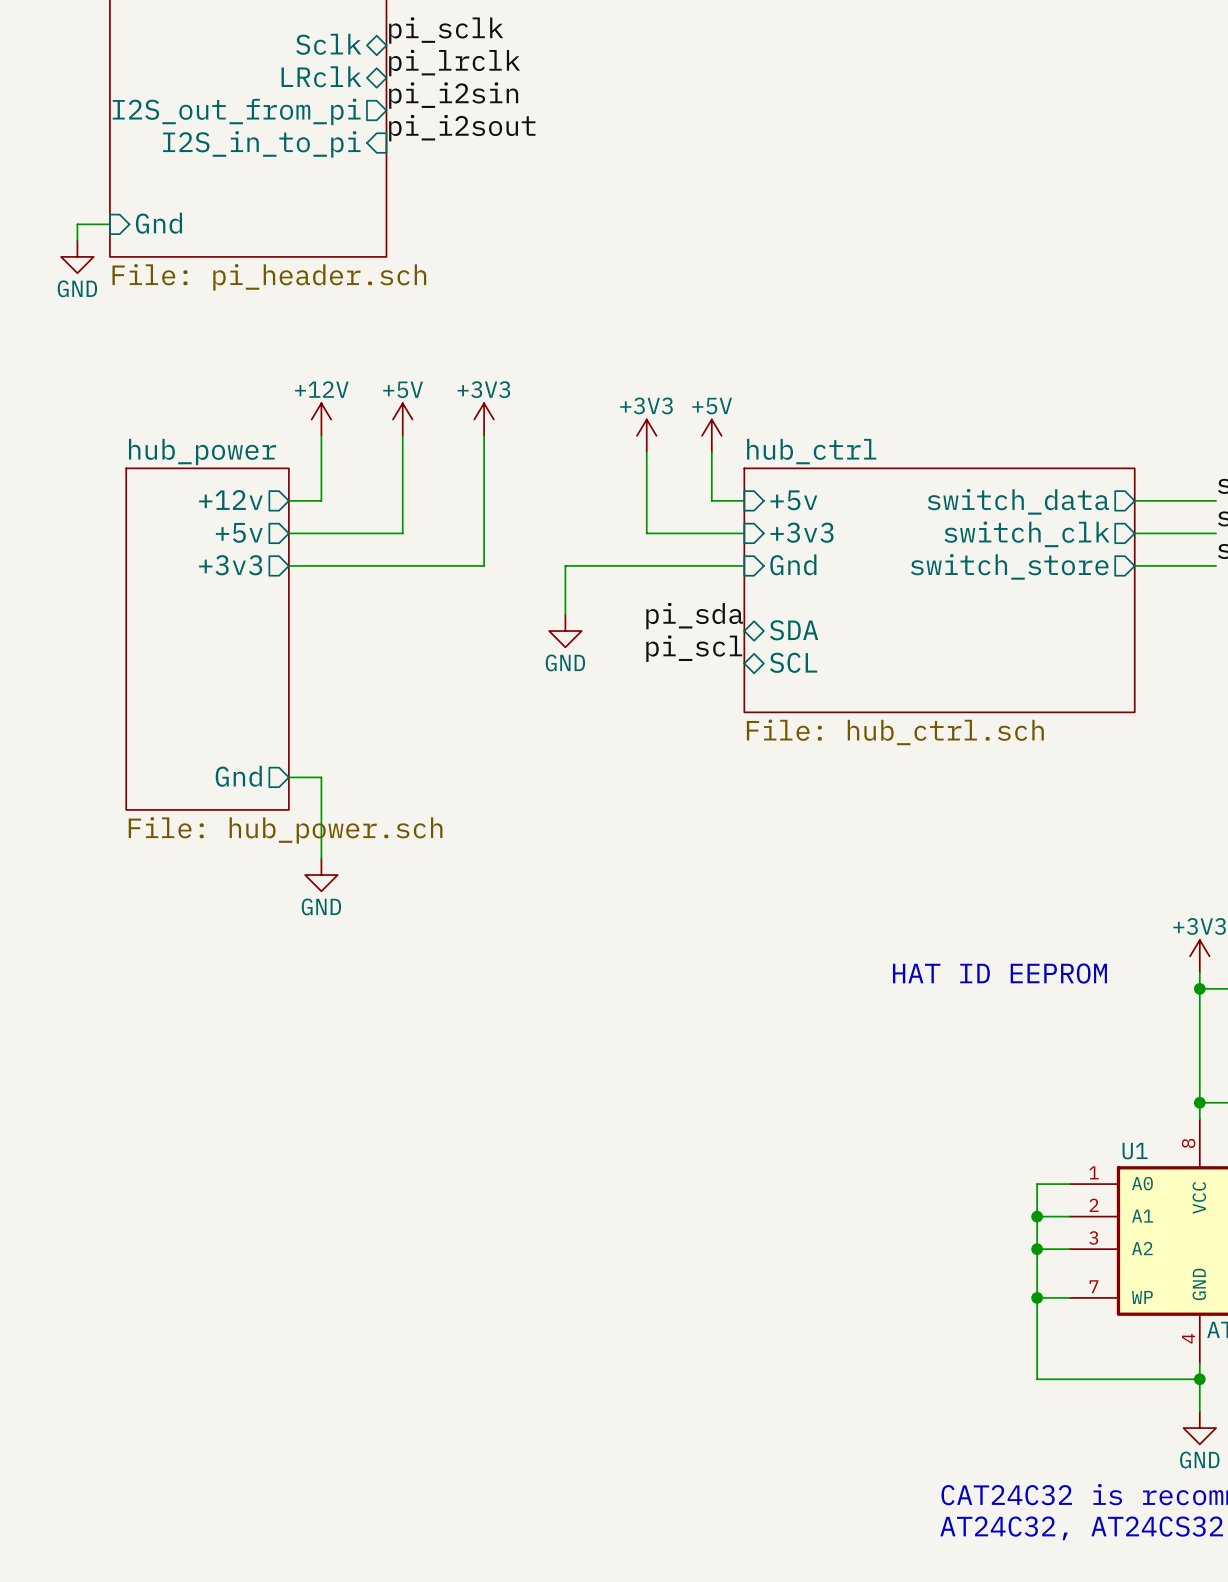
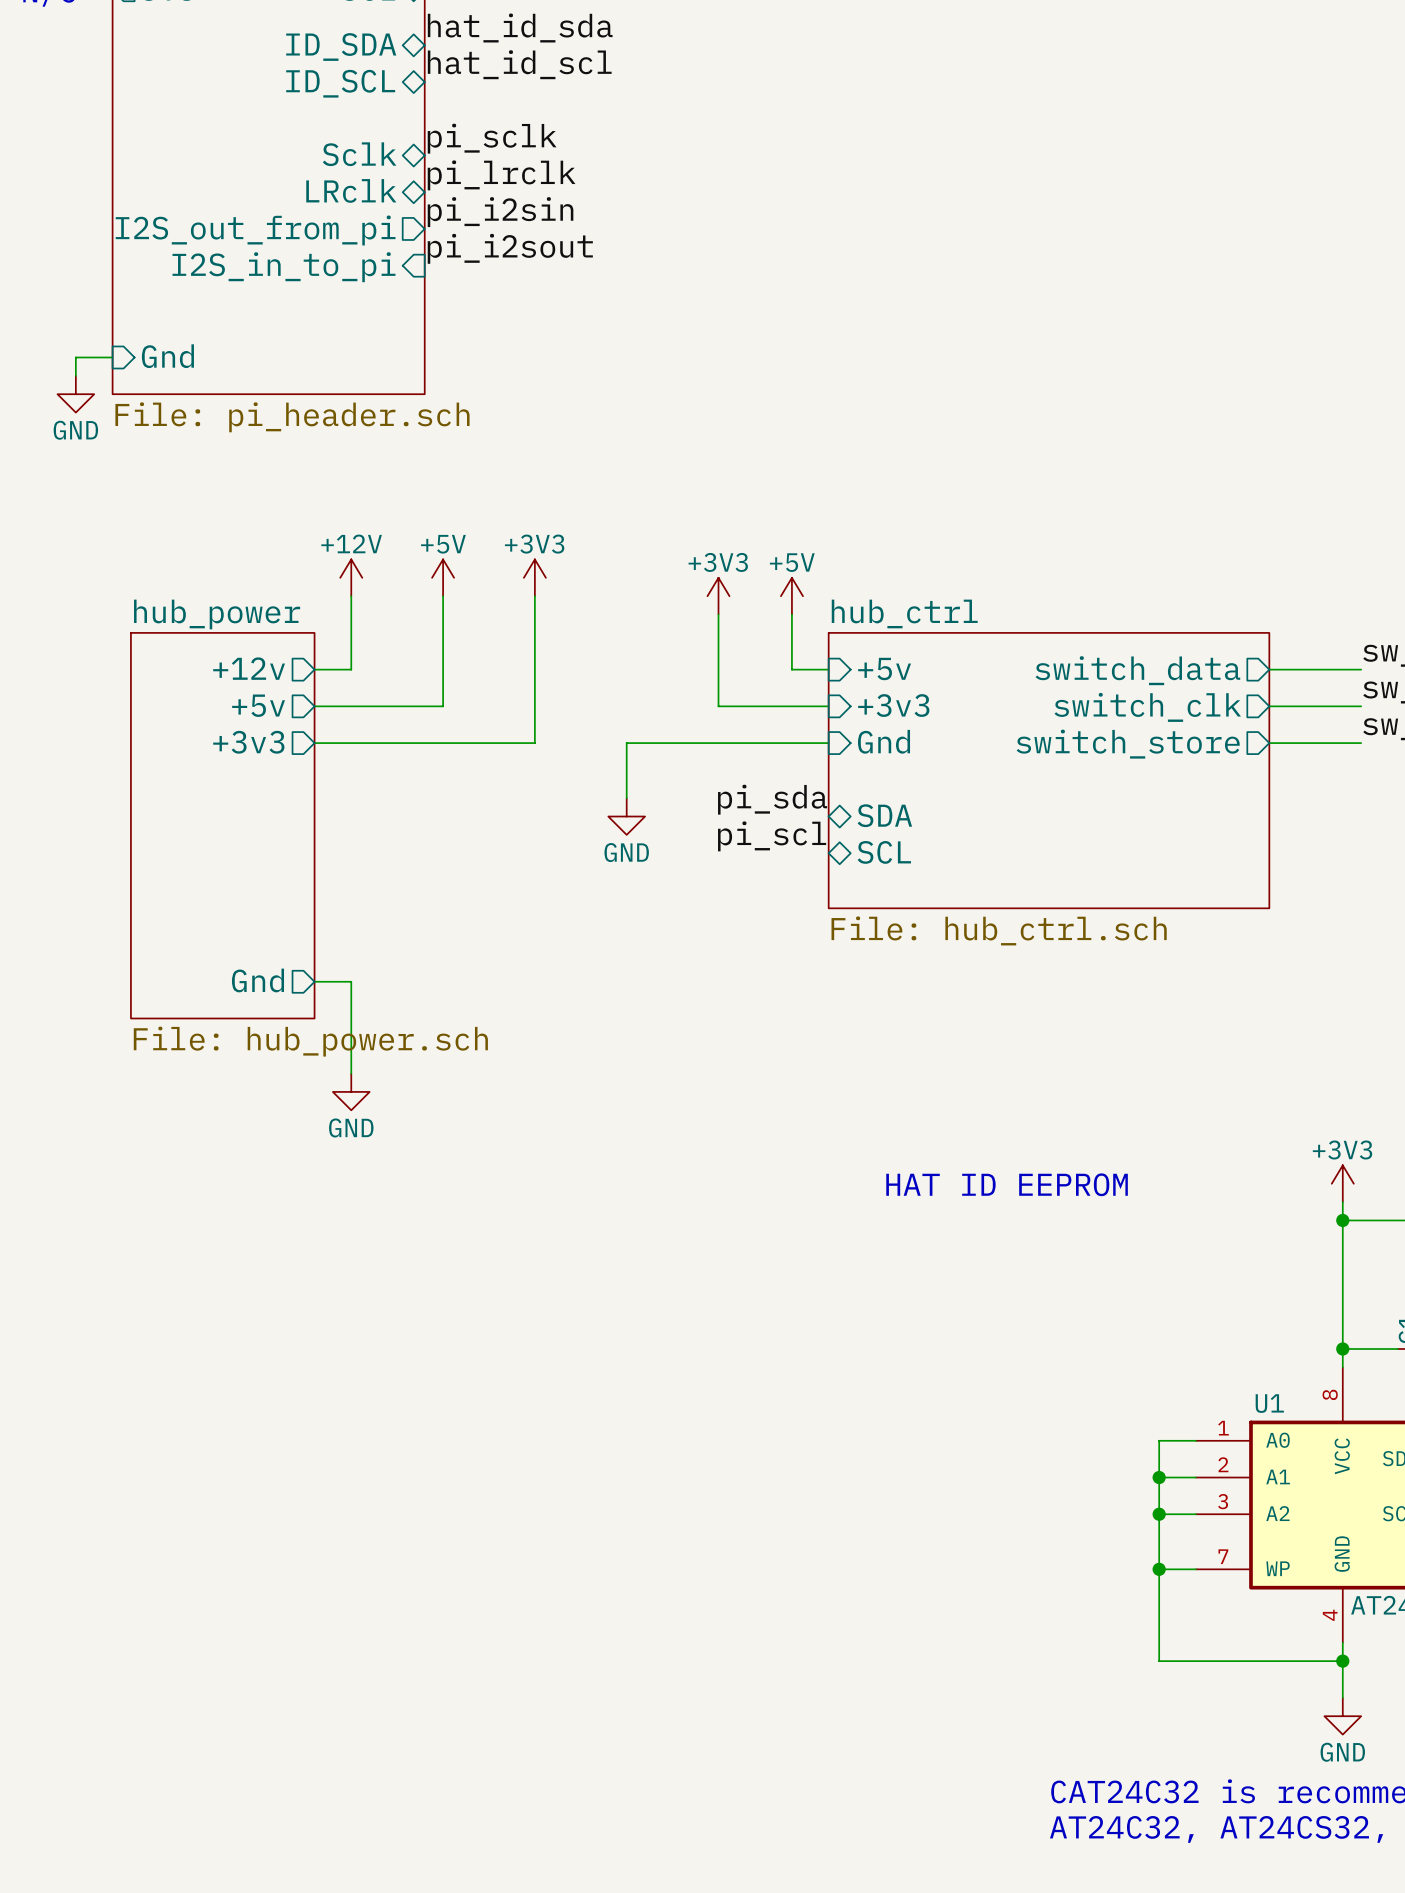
text position: HAT ID EEPROM (999, 973) -> HAT ID EEPROM (1007, 1184)

